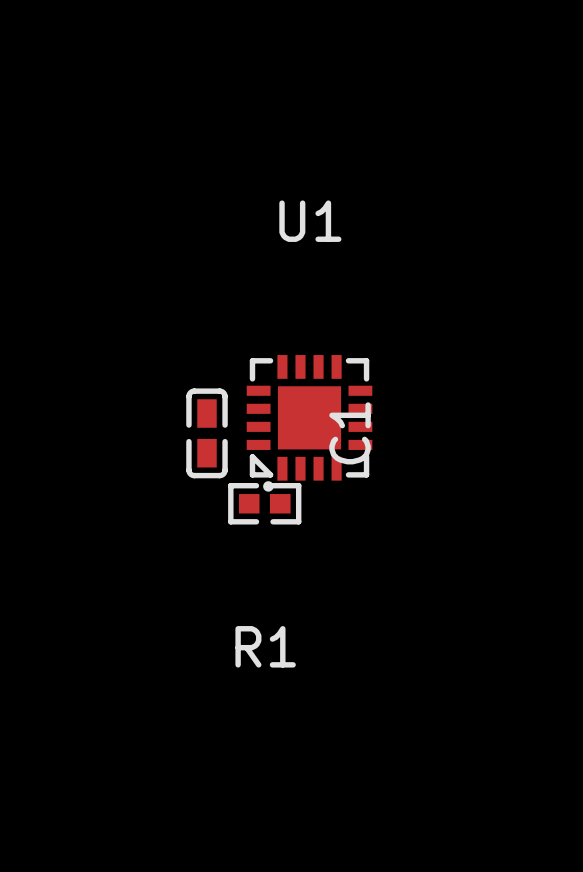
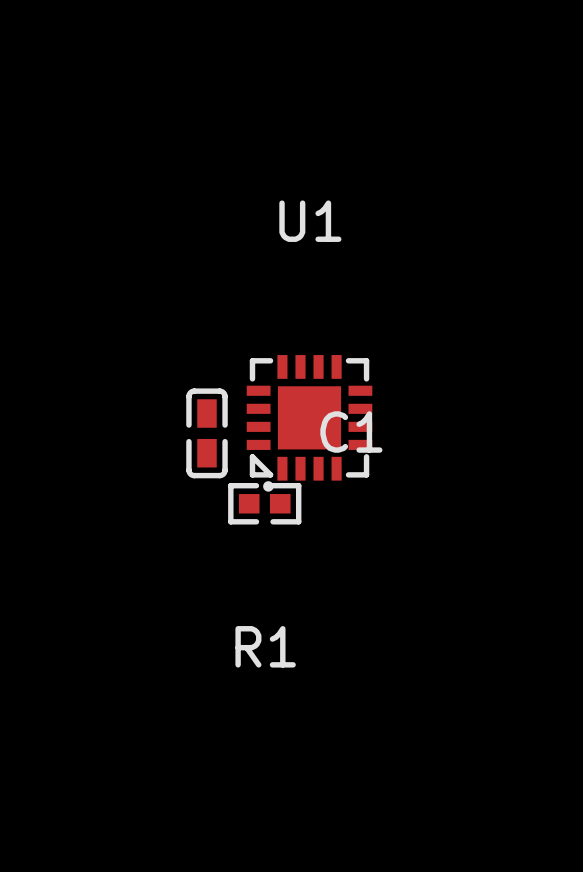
C1 name rotation: 0° (350, 433) -> 90° clockwise (351, 432)

